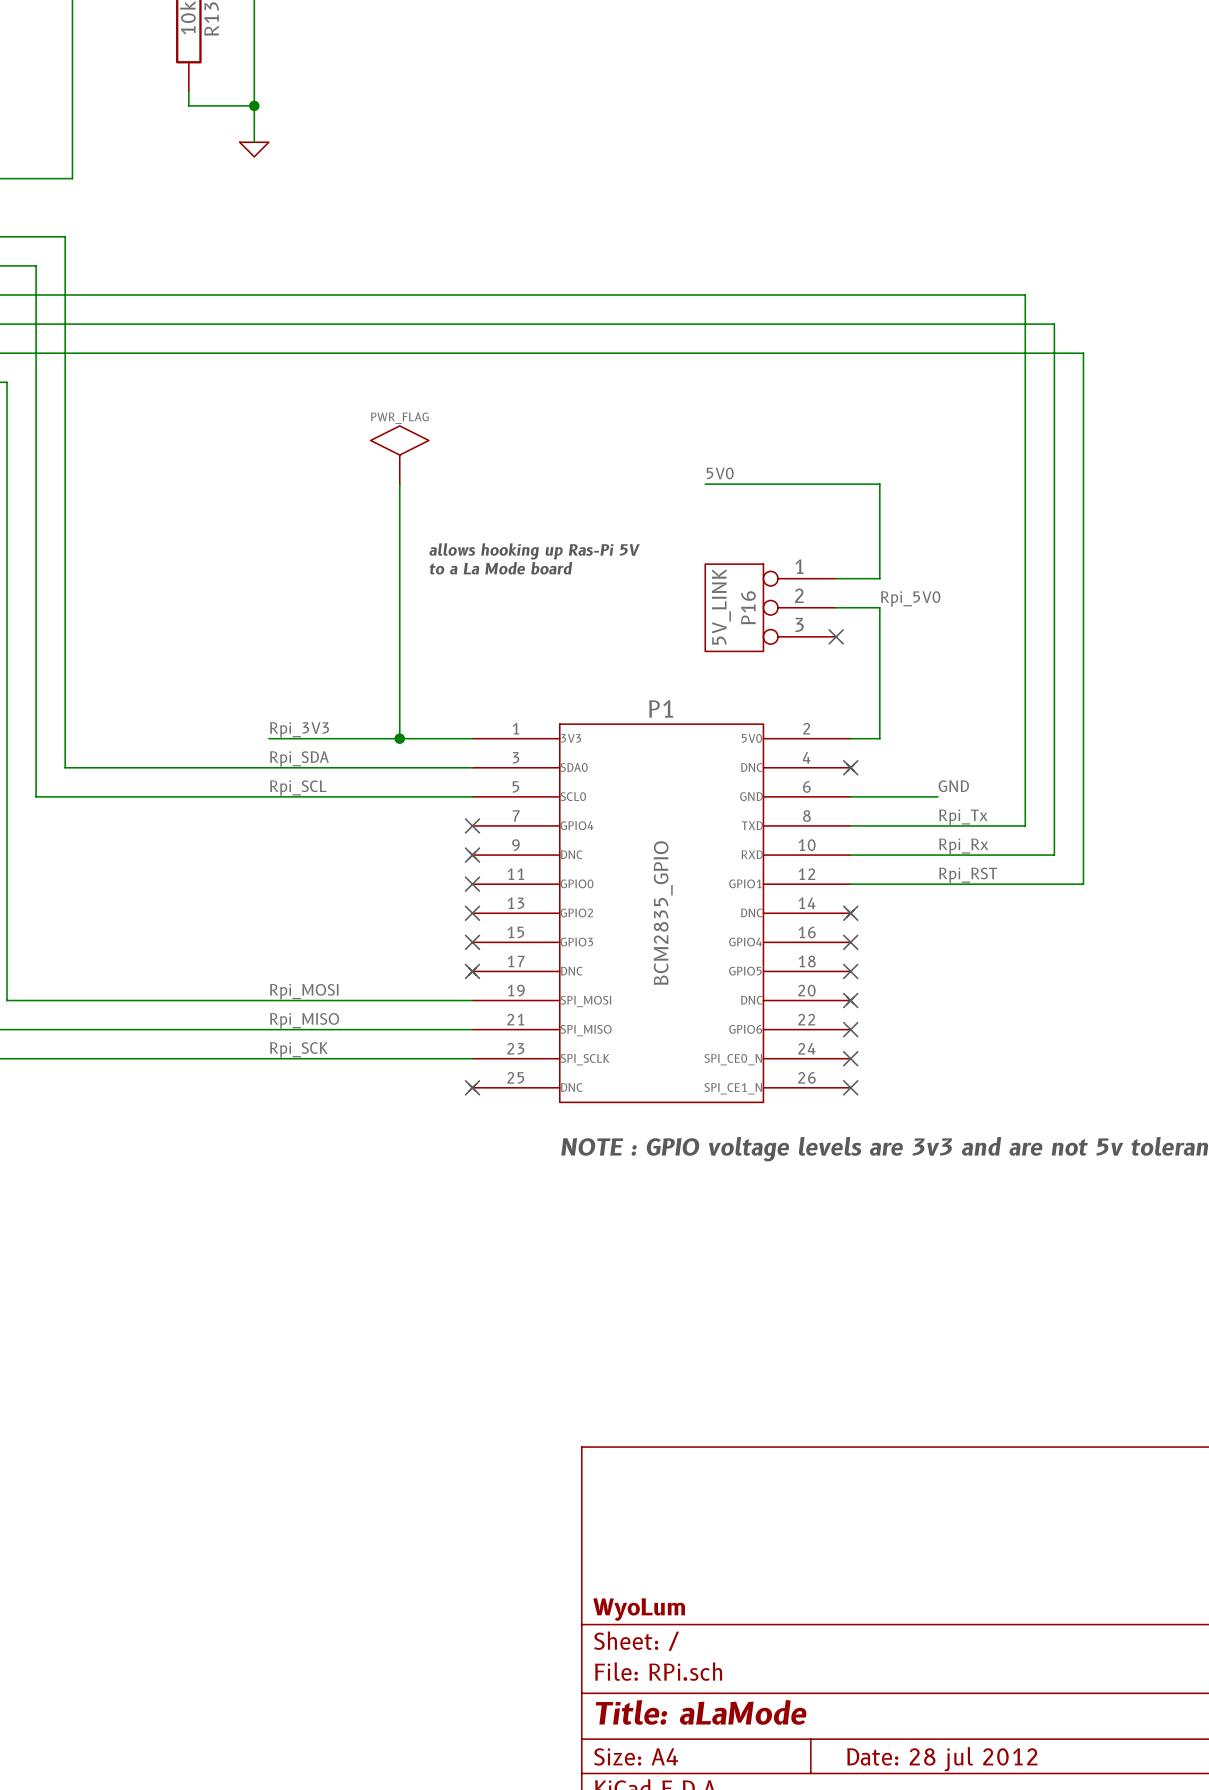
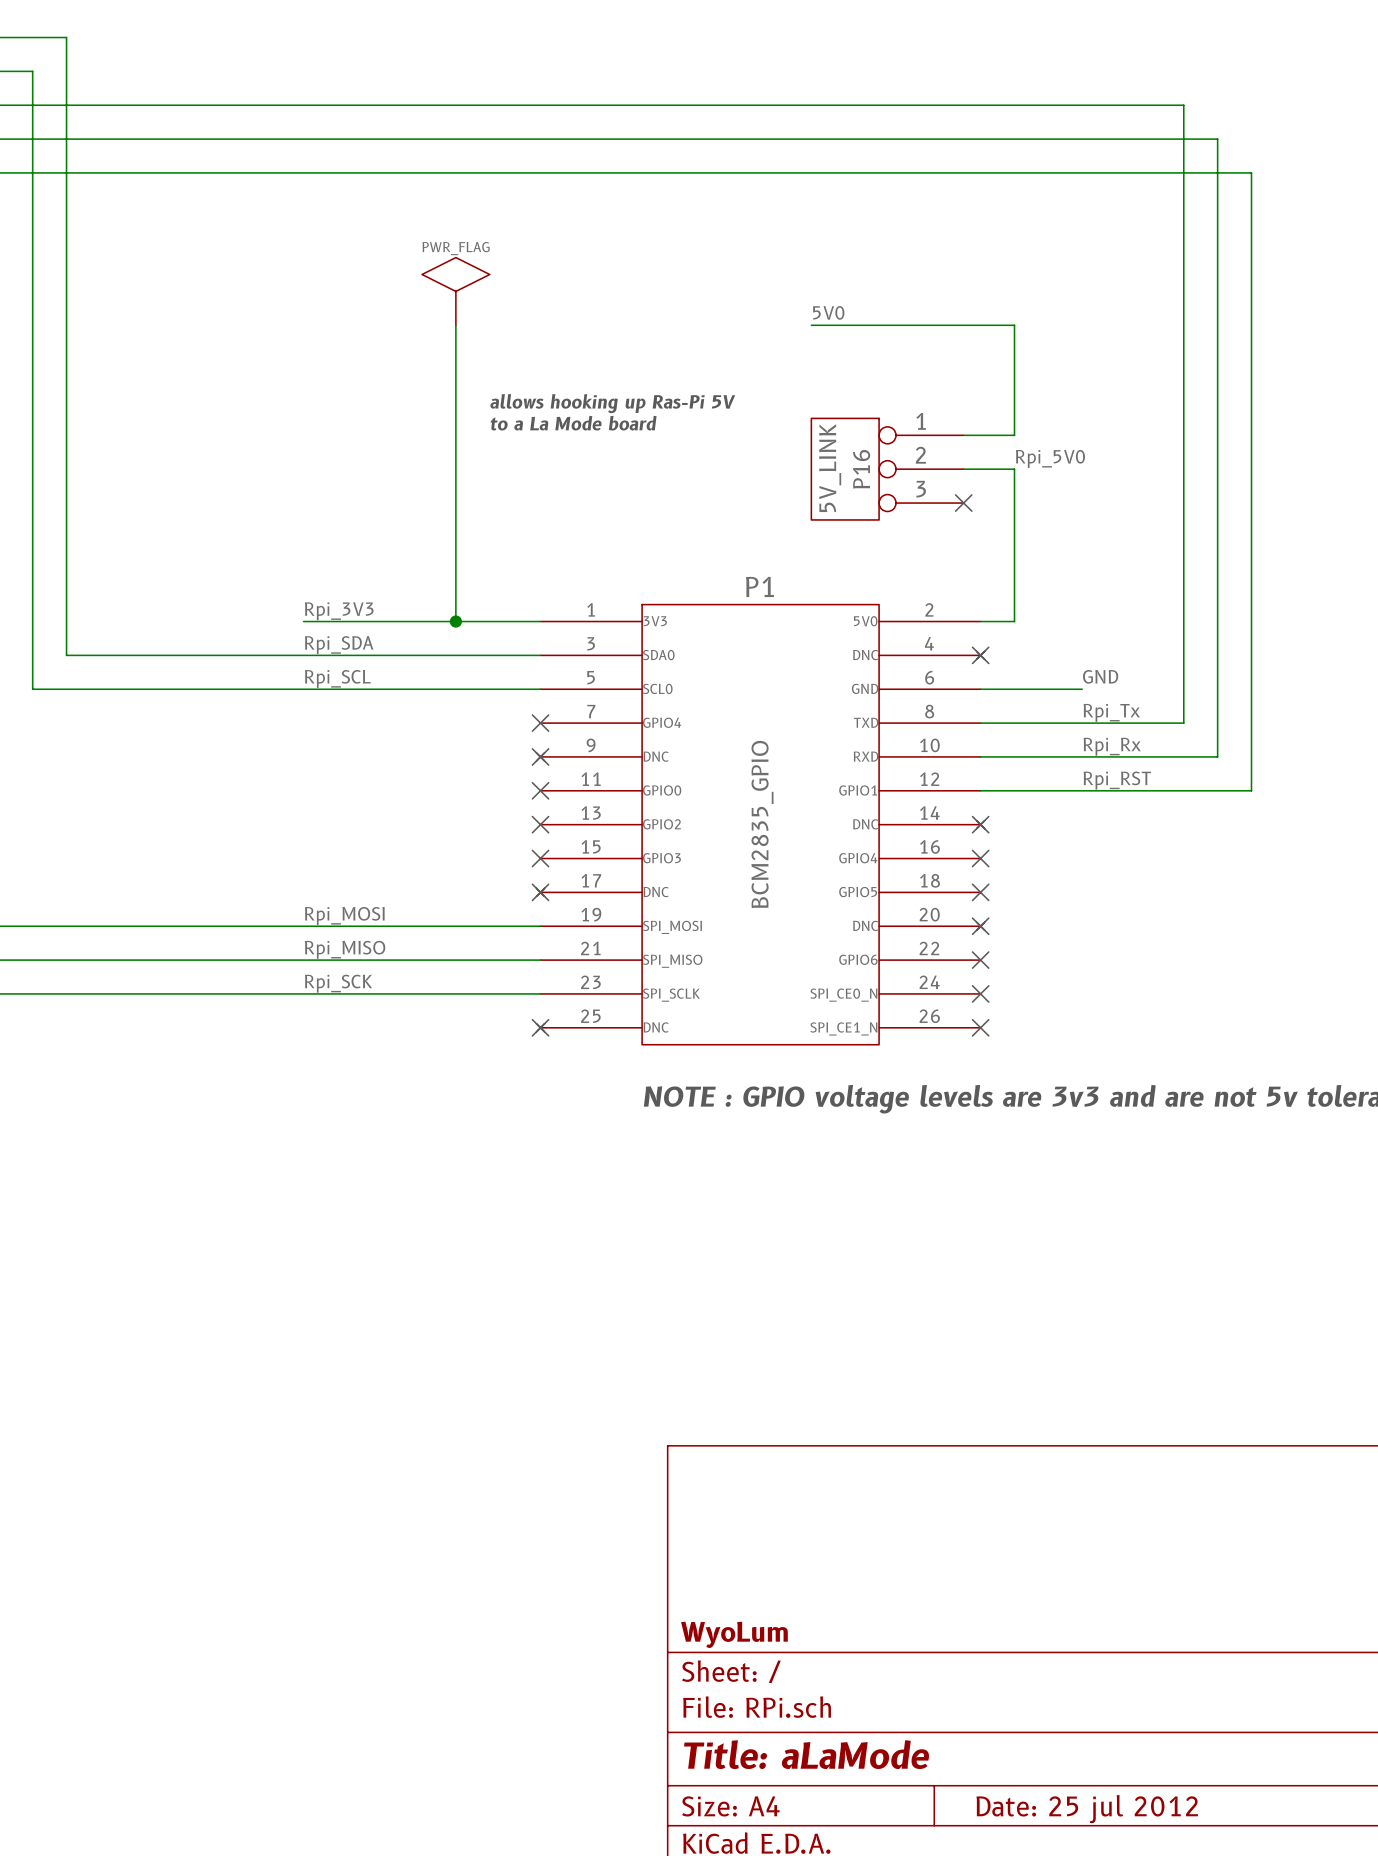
title block: Date: 28 jul 2012 (942, 1759) -> Date: 25 jul 2012 (1087, 1809)

